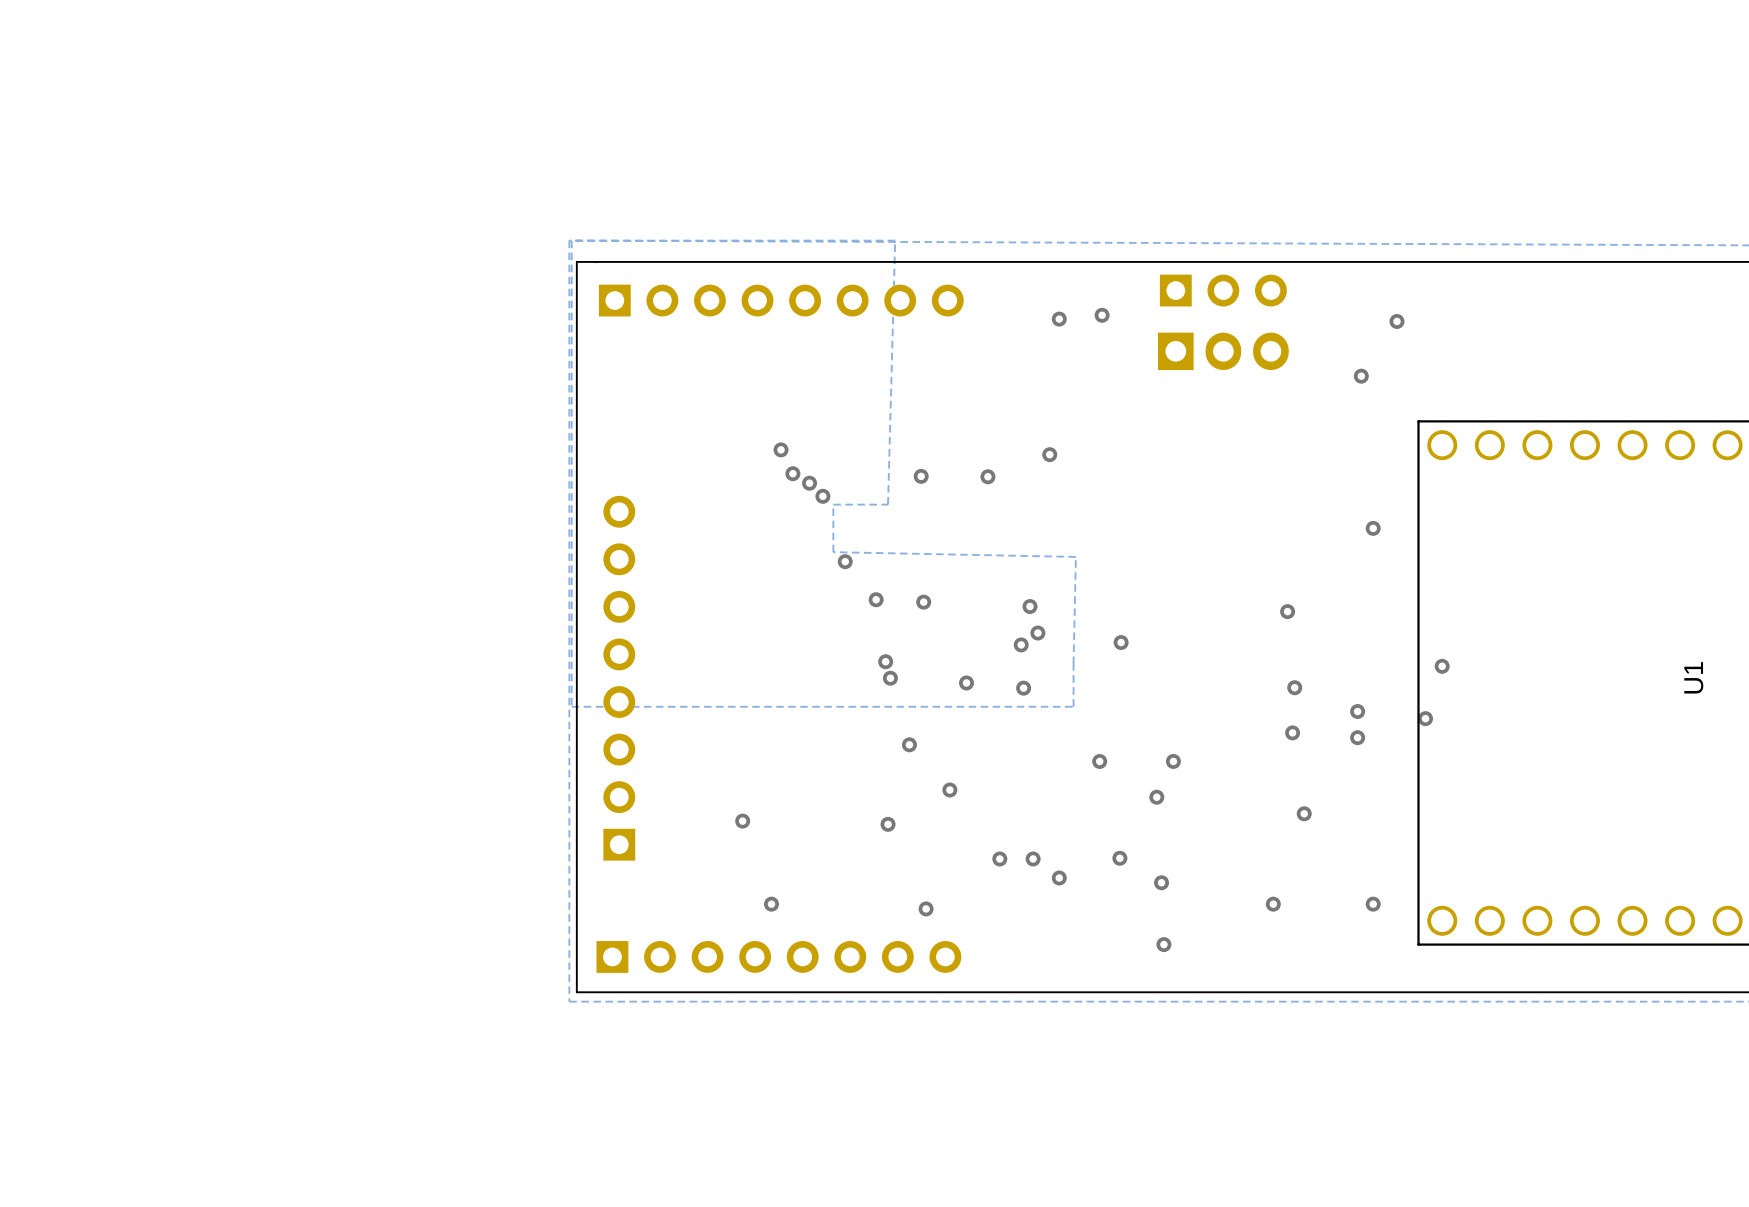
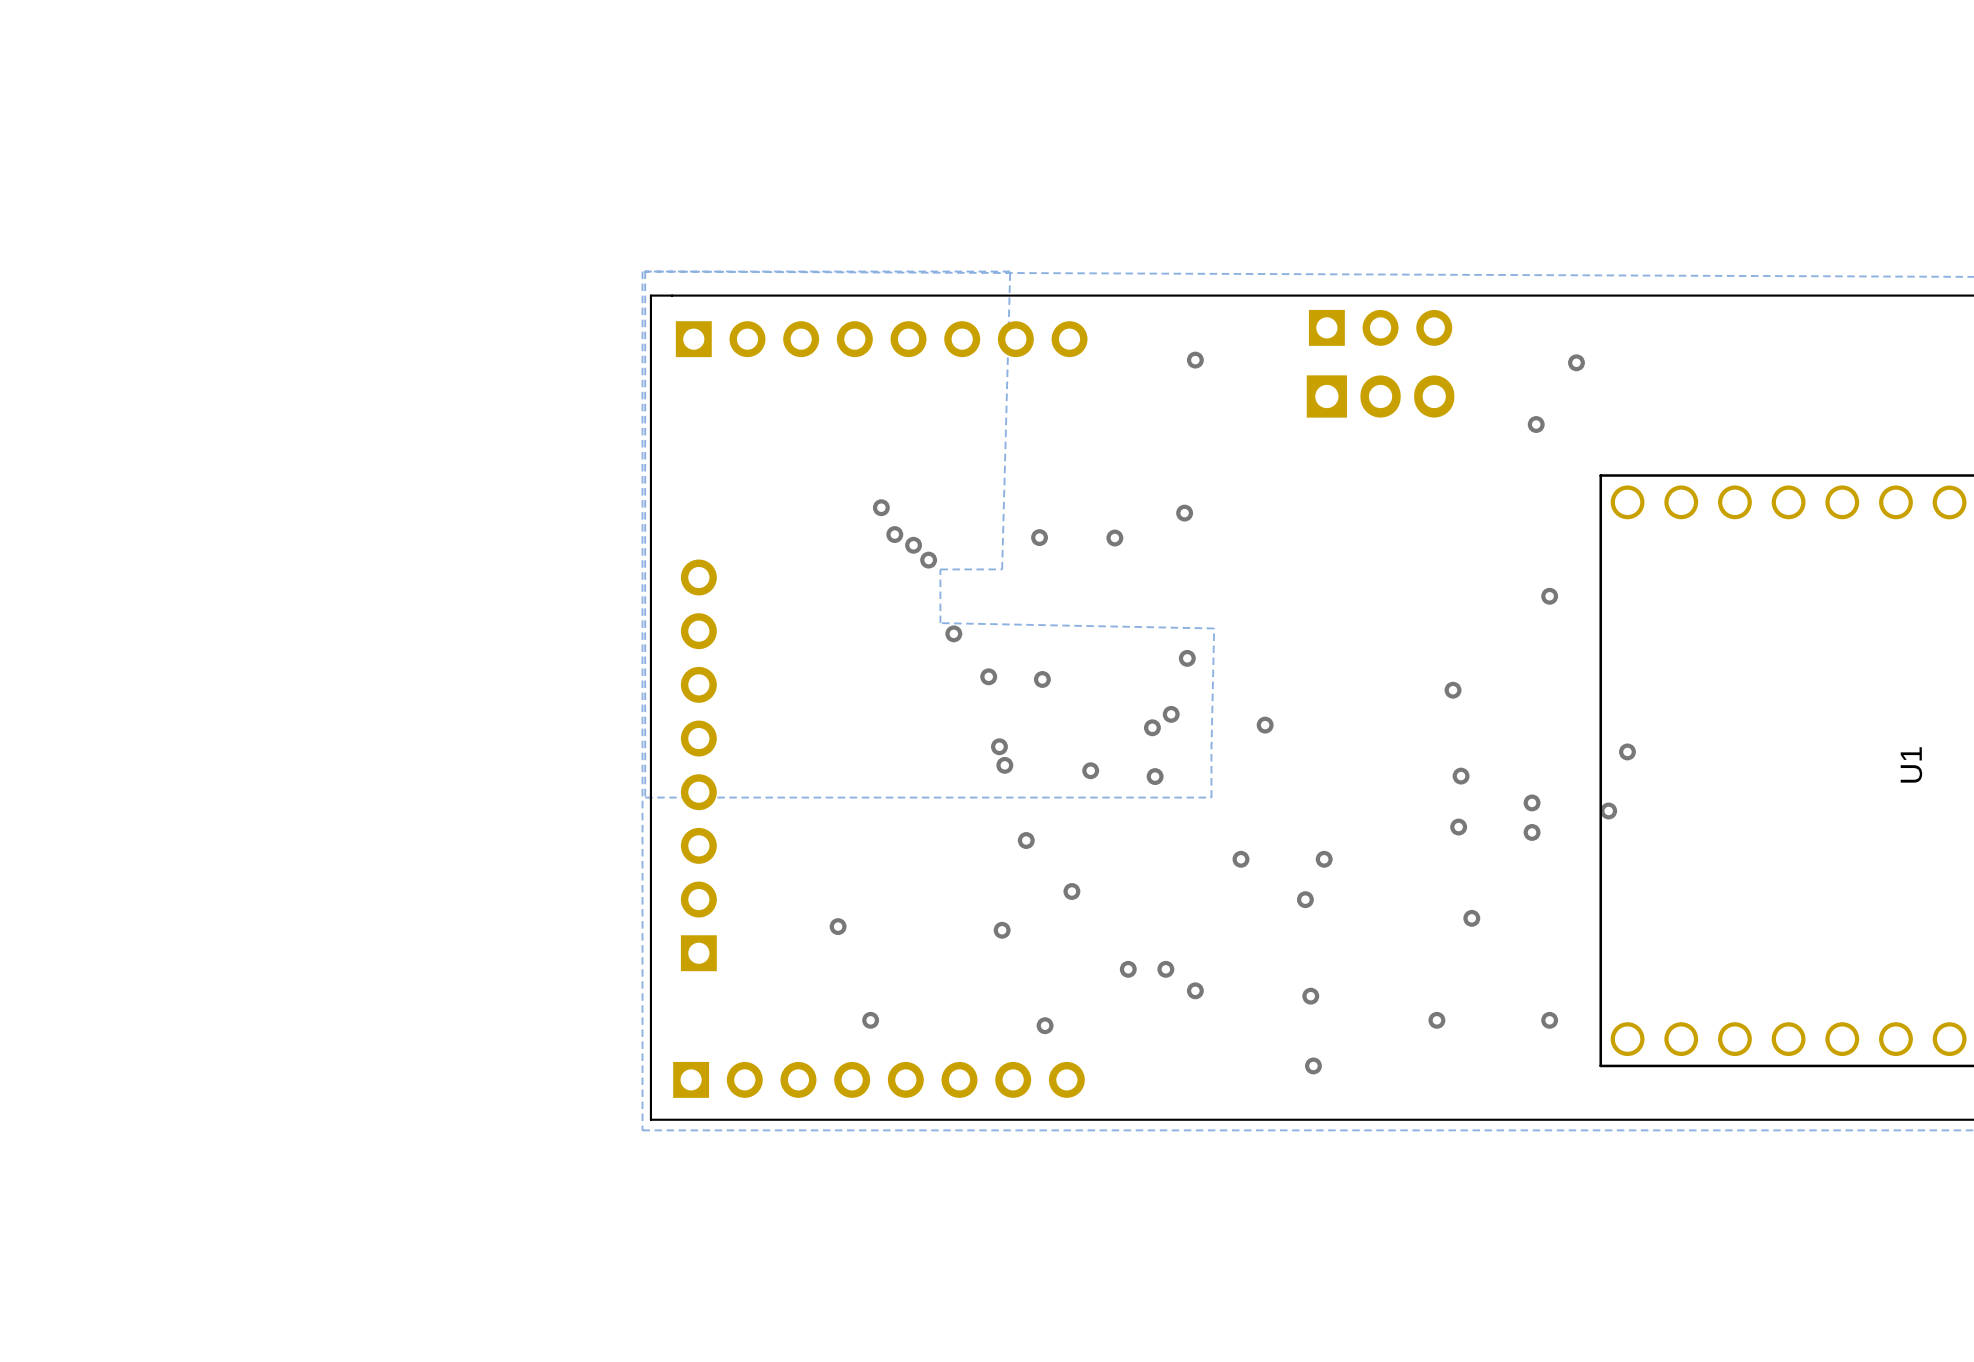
via: (1102, 315) -> none
via position: (1030, 606) -> (1187, 658)
via: (1119, 858) -> none

